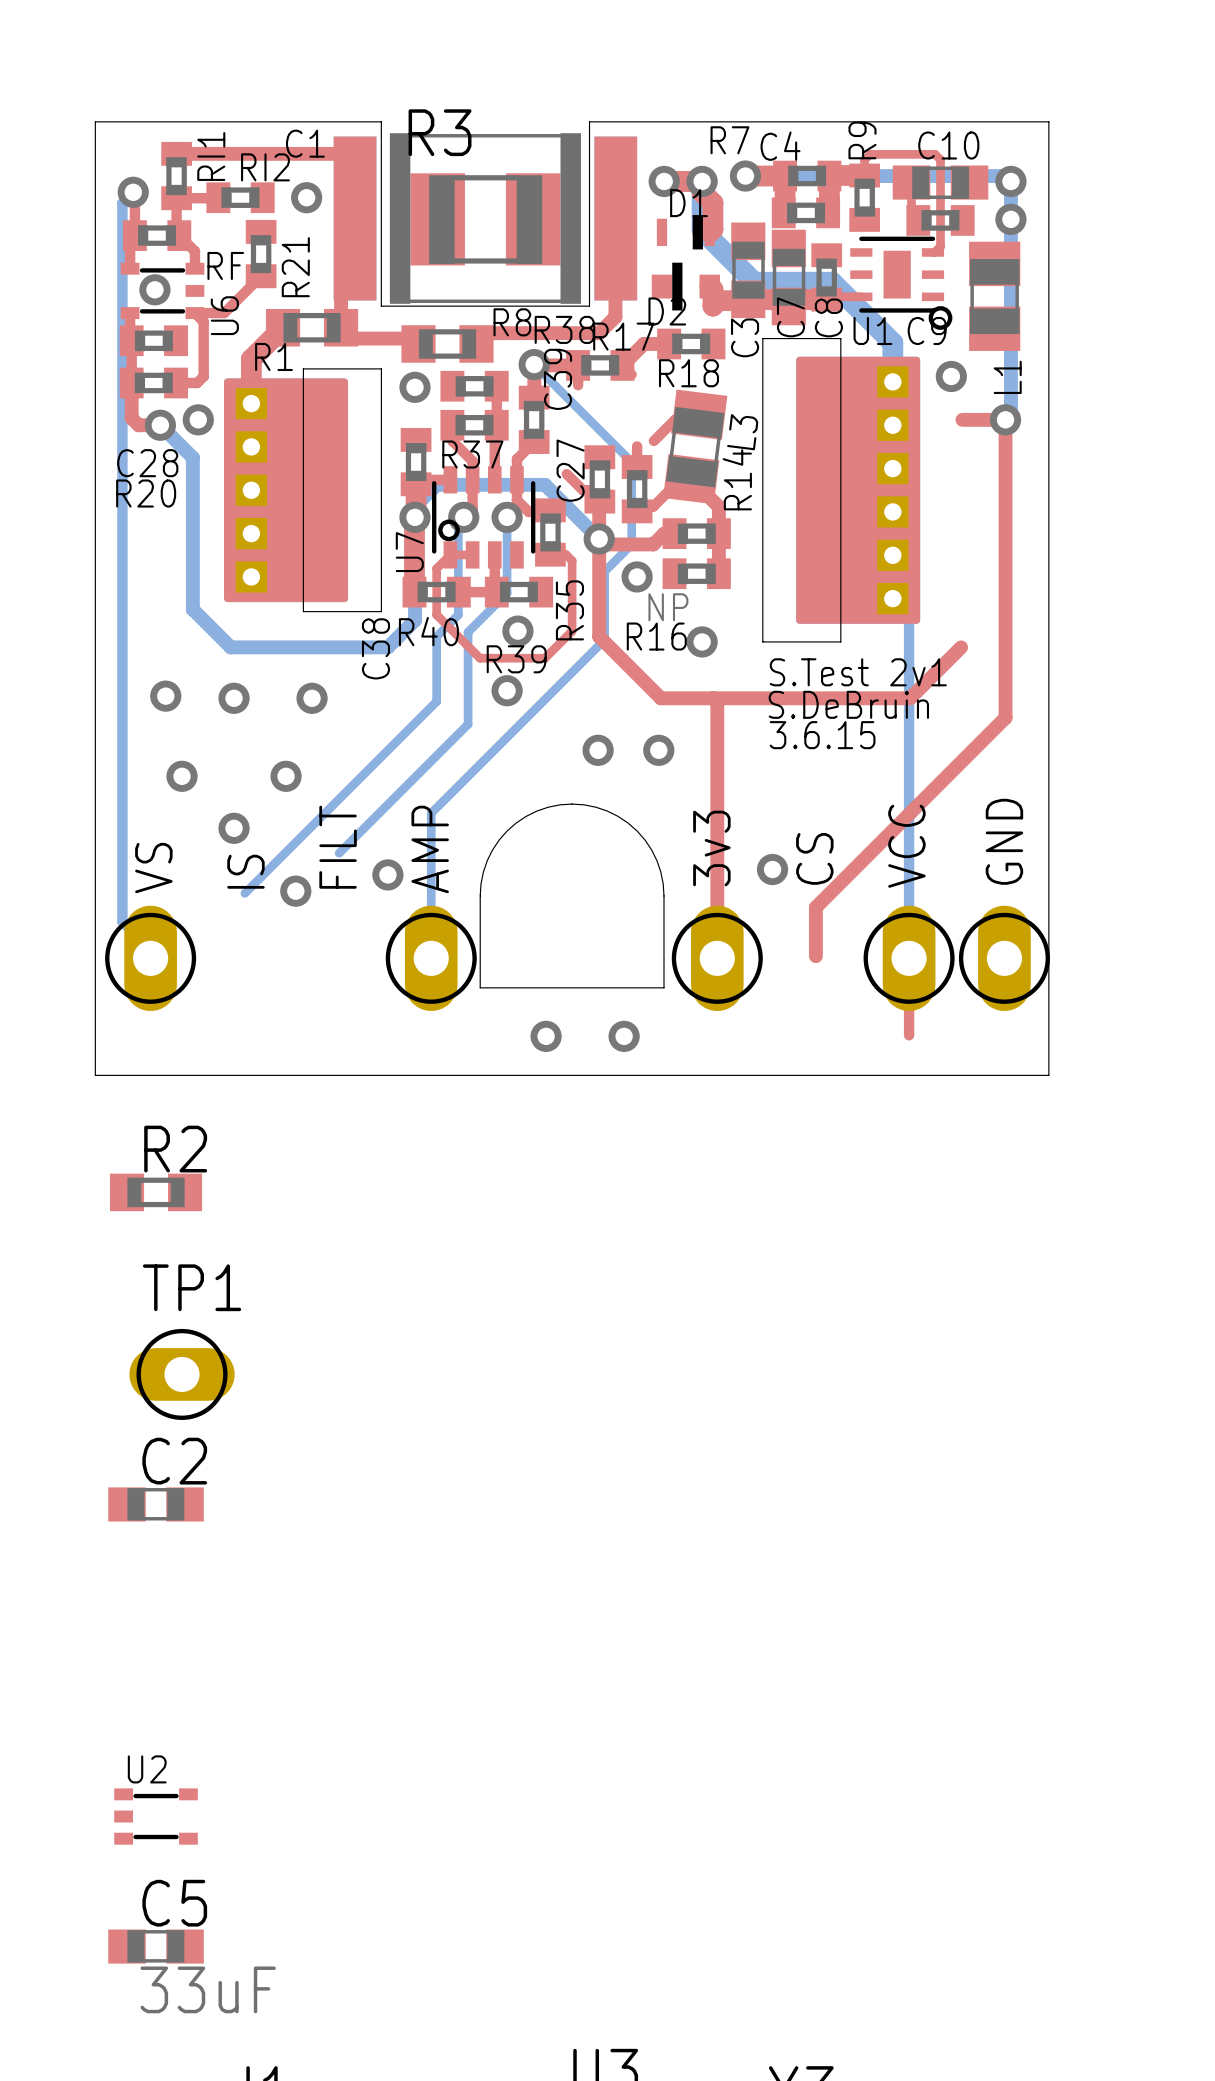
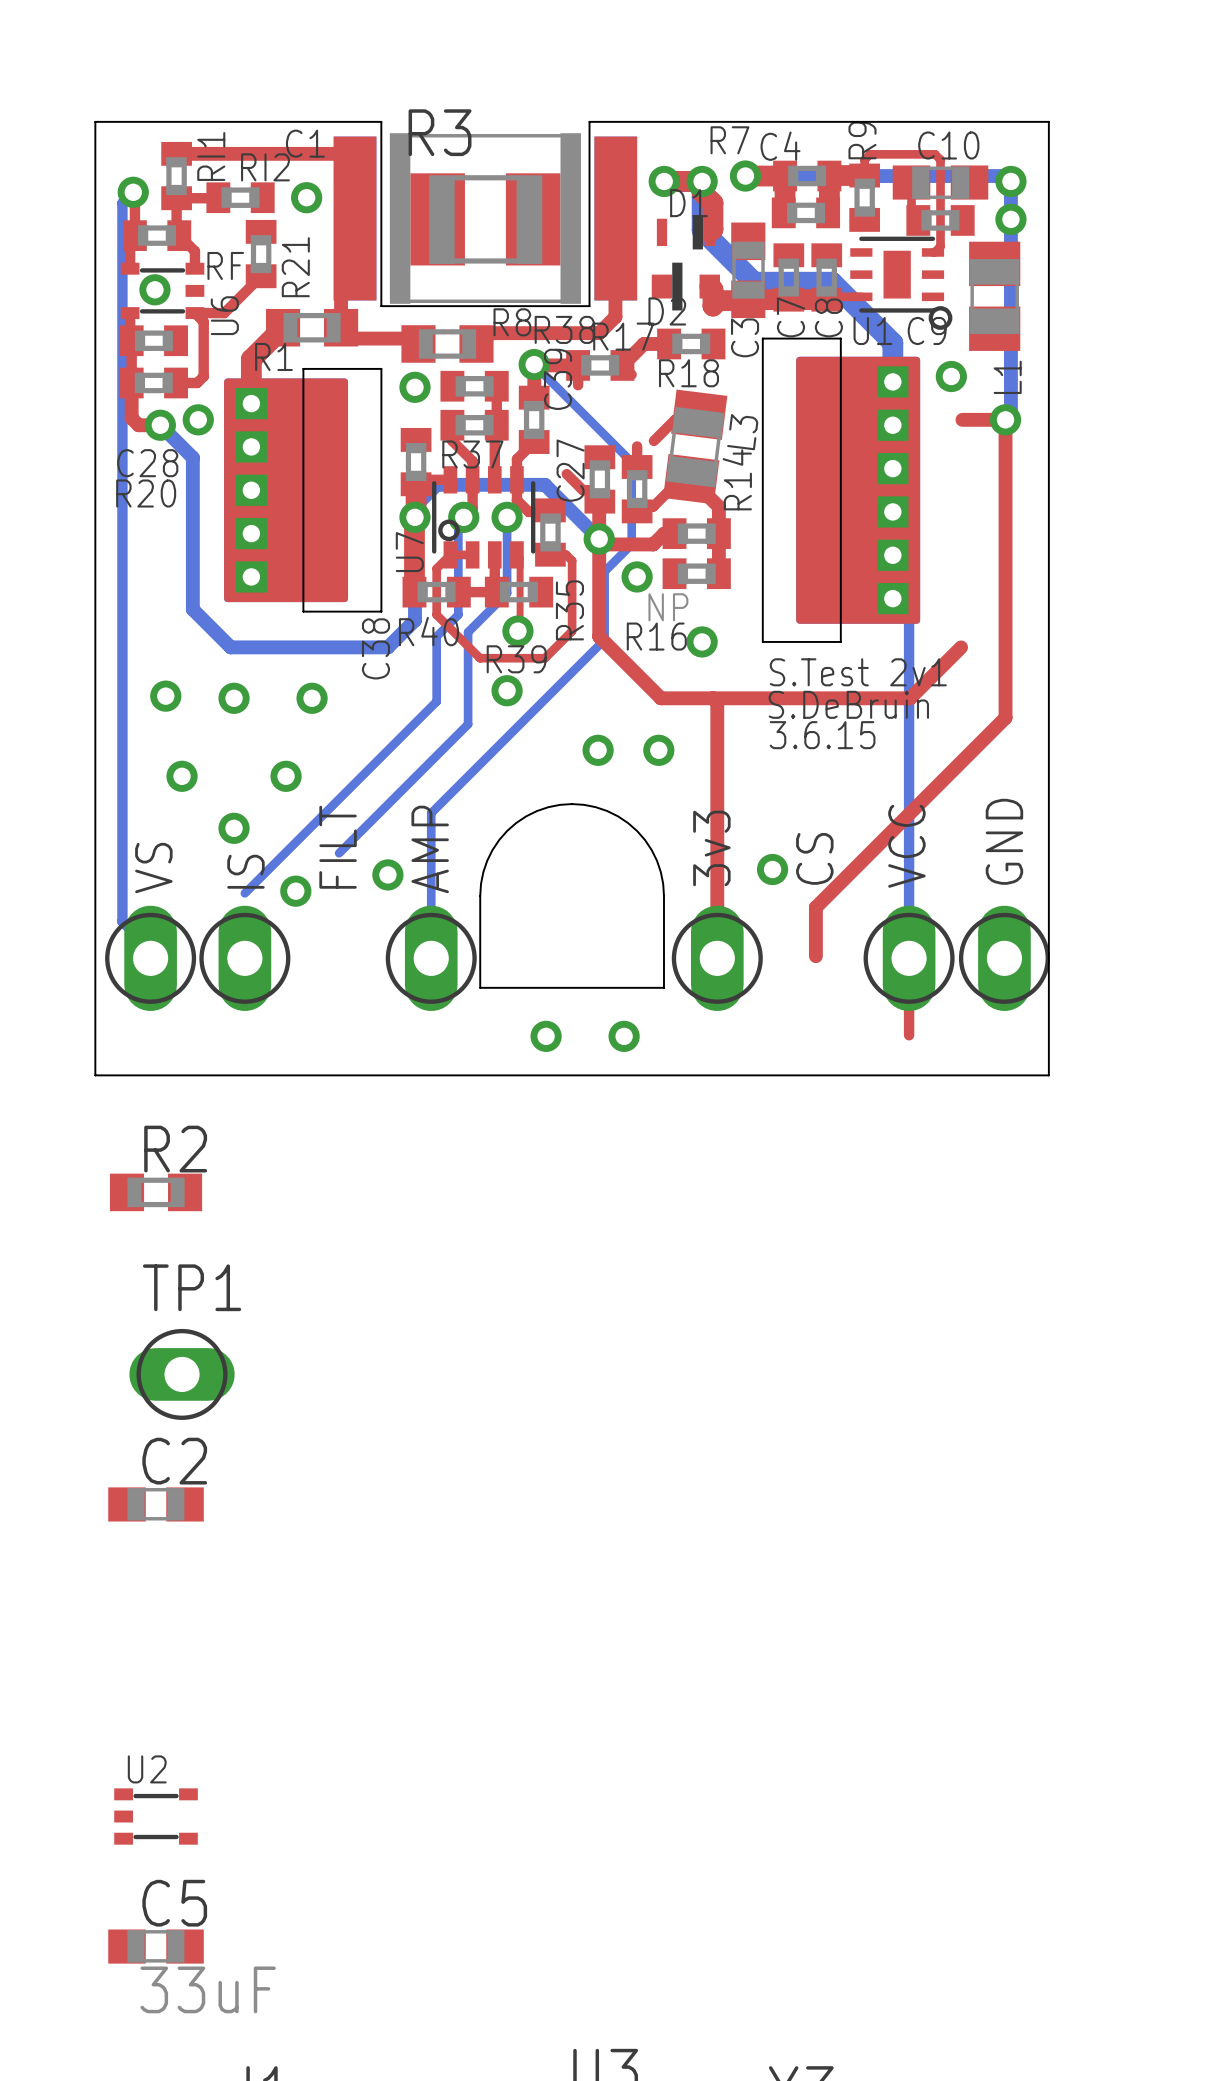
C7 footprint: [771, 229, 806, 326] -> [773, 243, 805, 312]
top track: none -> (516, 554) (520, 558) (520, 620) (512, 627) (512, 631)
part: none -> (244, 958)

